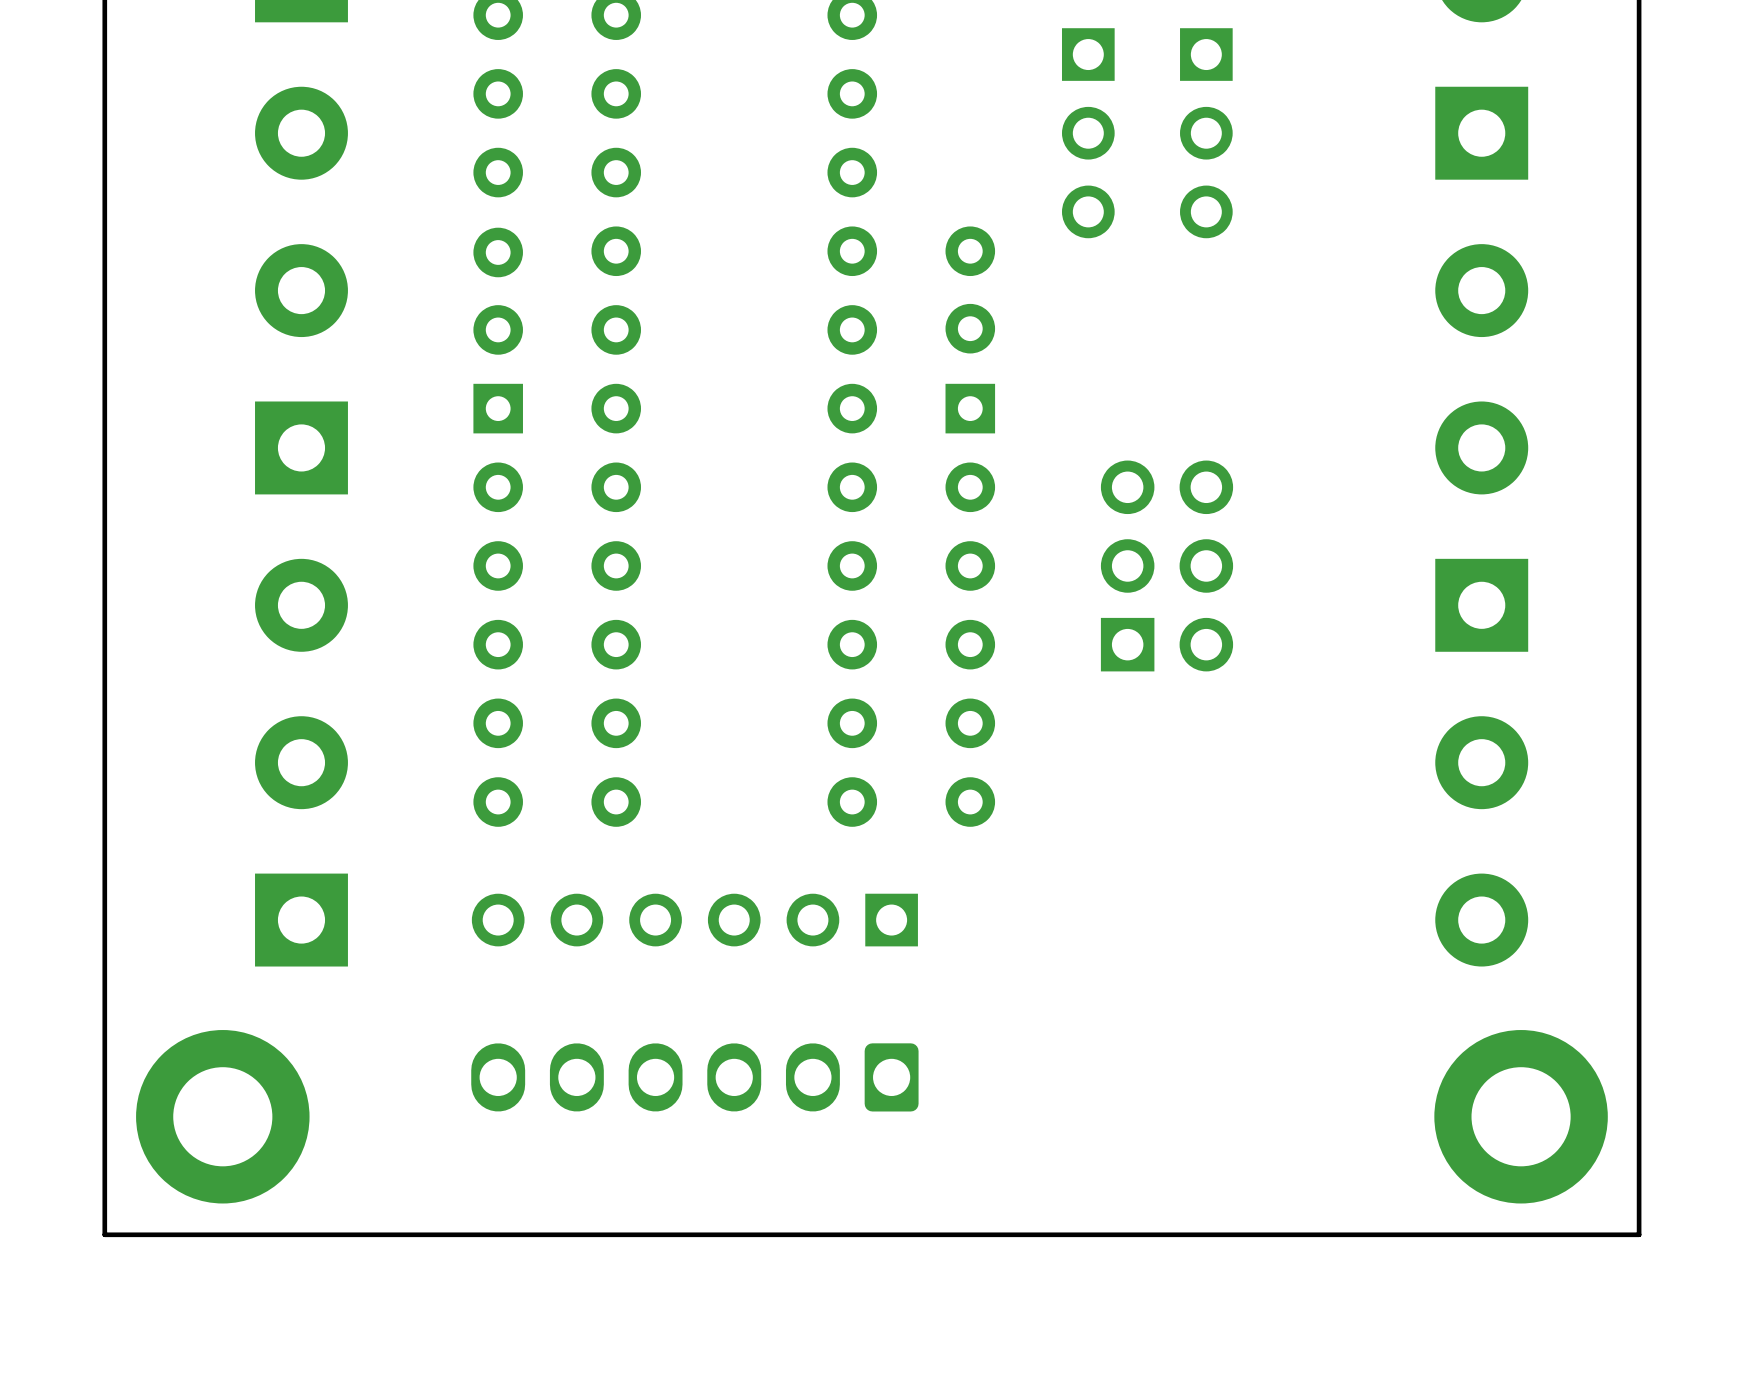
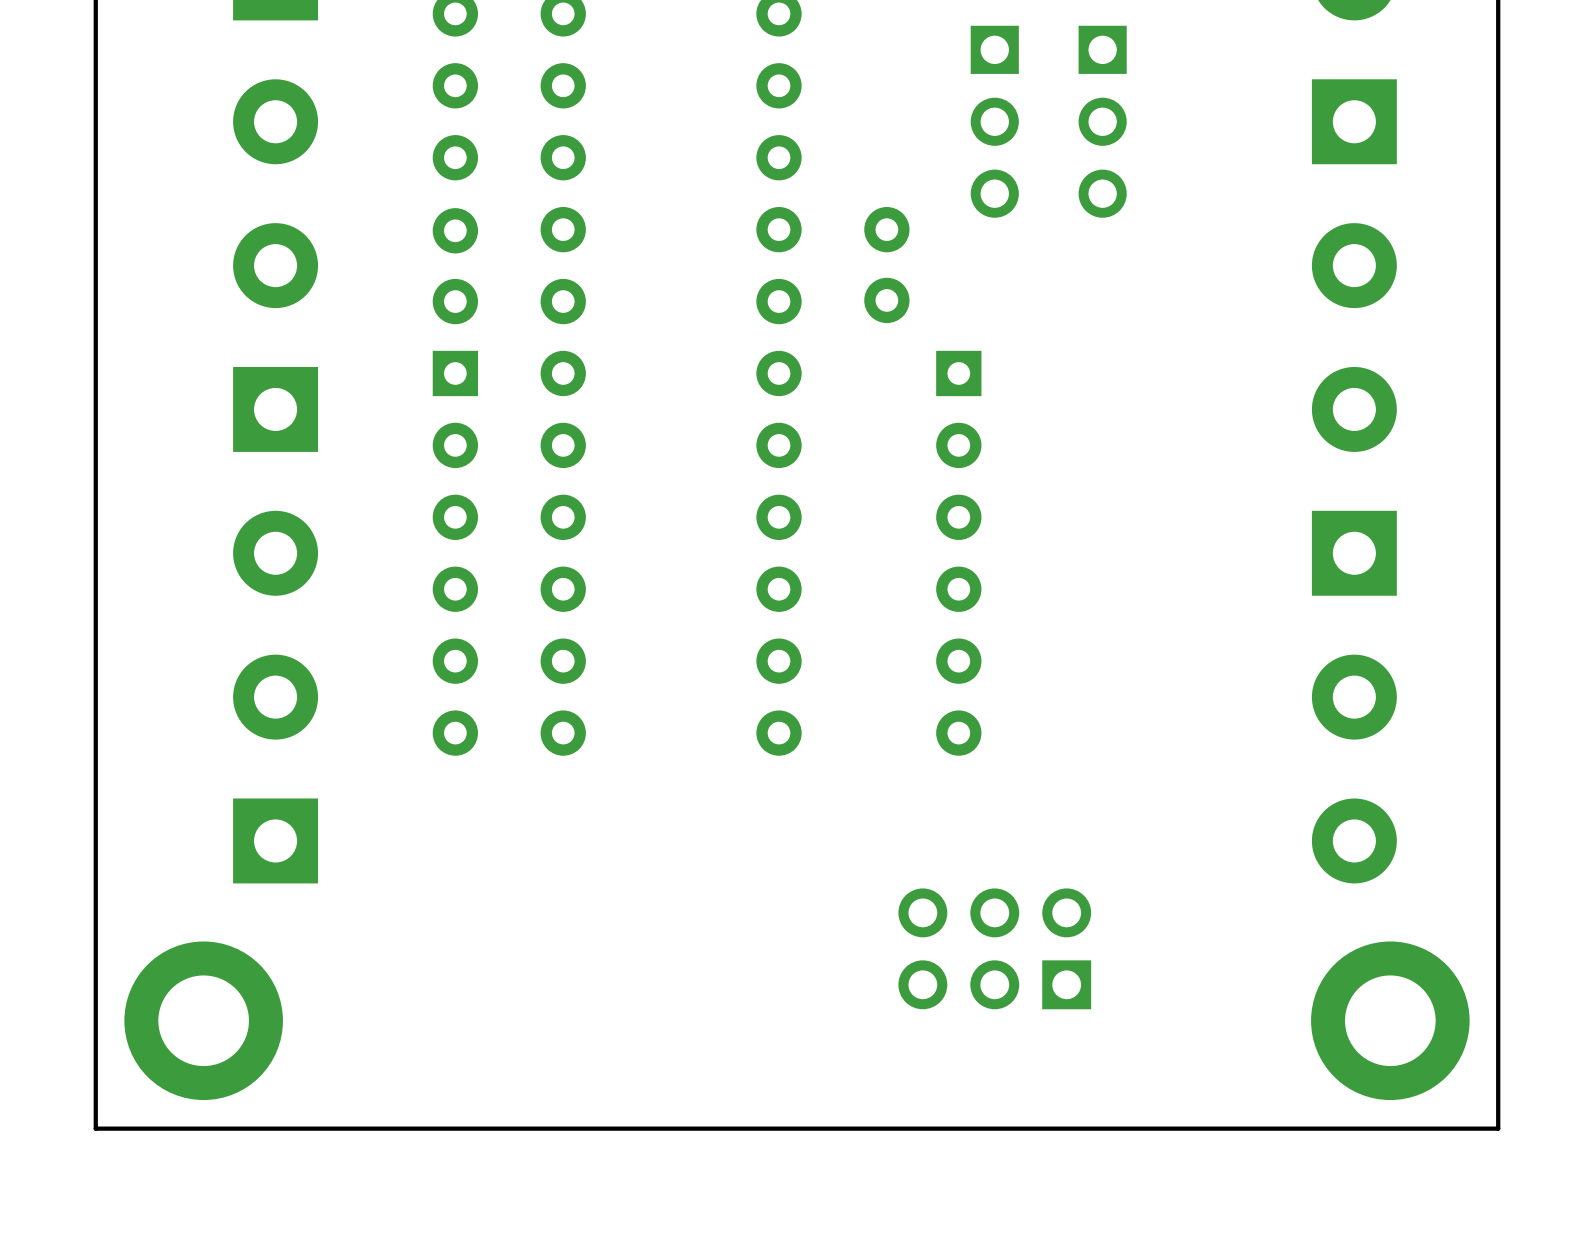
part rotation: 0° (1167, 565) -> 90° counterclockwise (994, 948)
part position: (1167, 565) -> (994, 948)
part position: (970, 605) -> (958, 553)
part: (694, 920) -> none
part: (694, 1077) -> none

